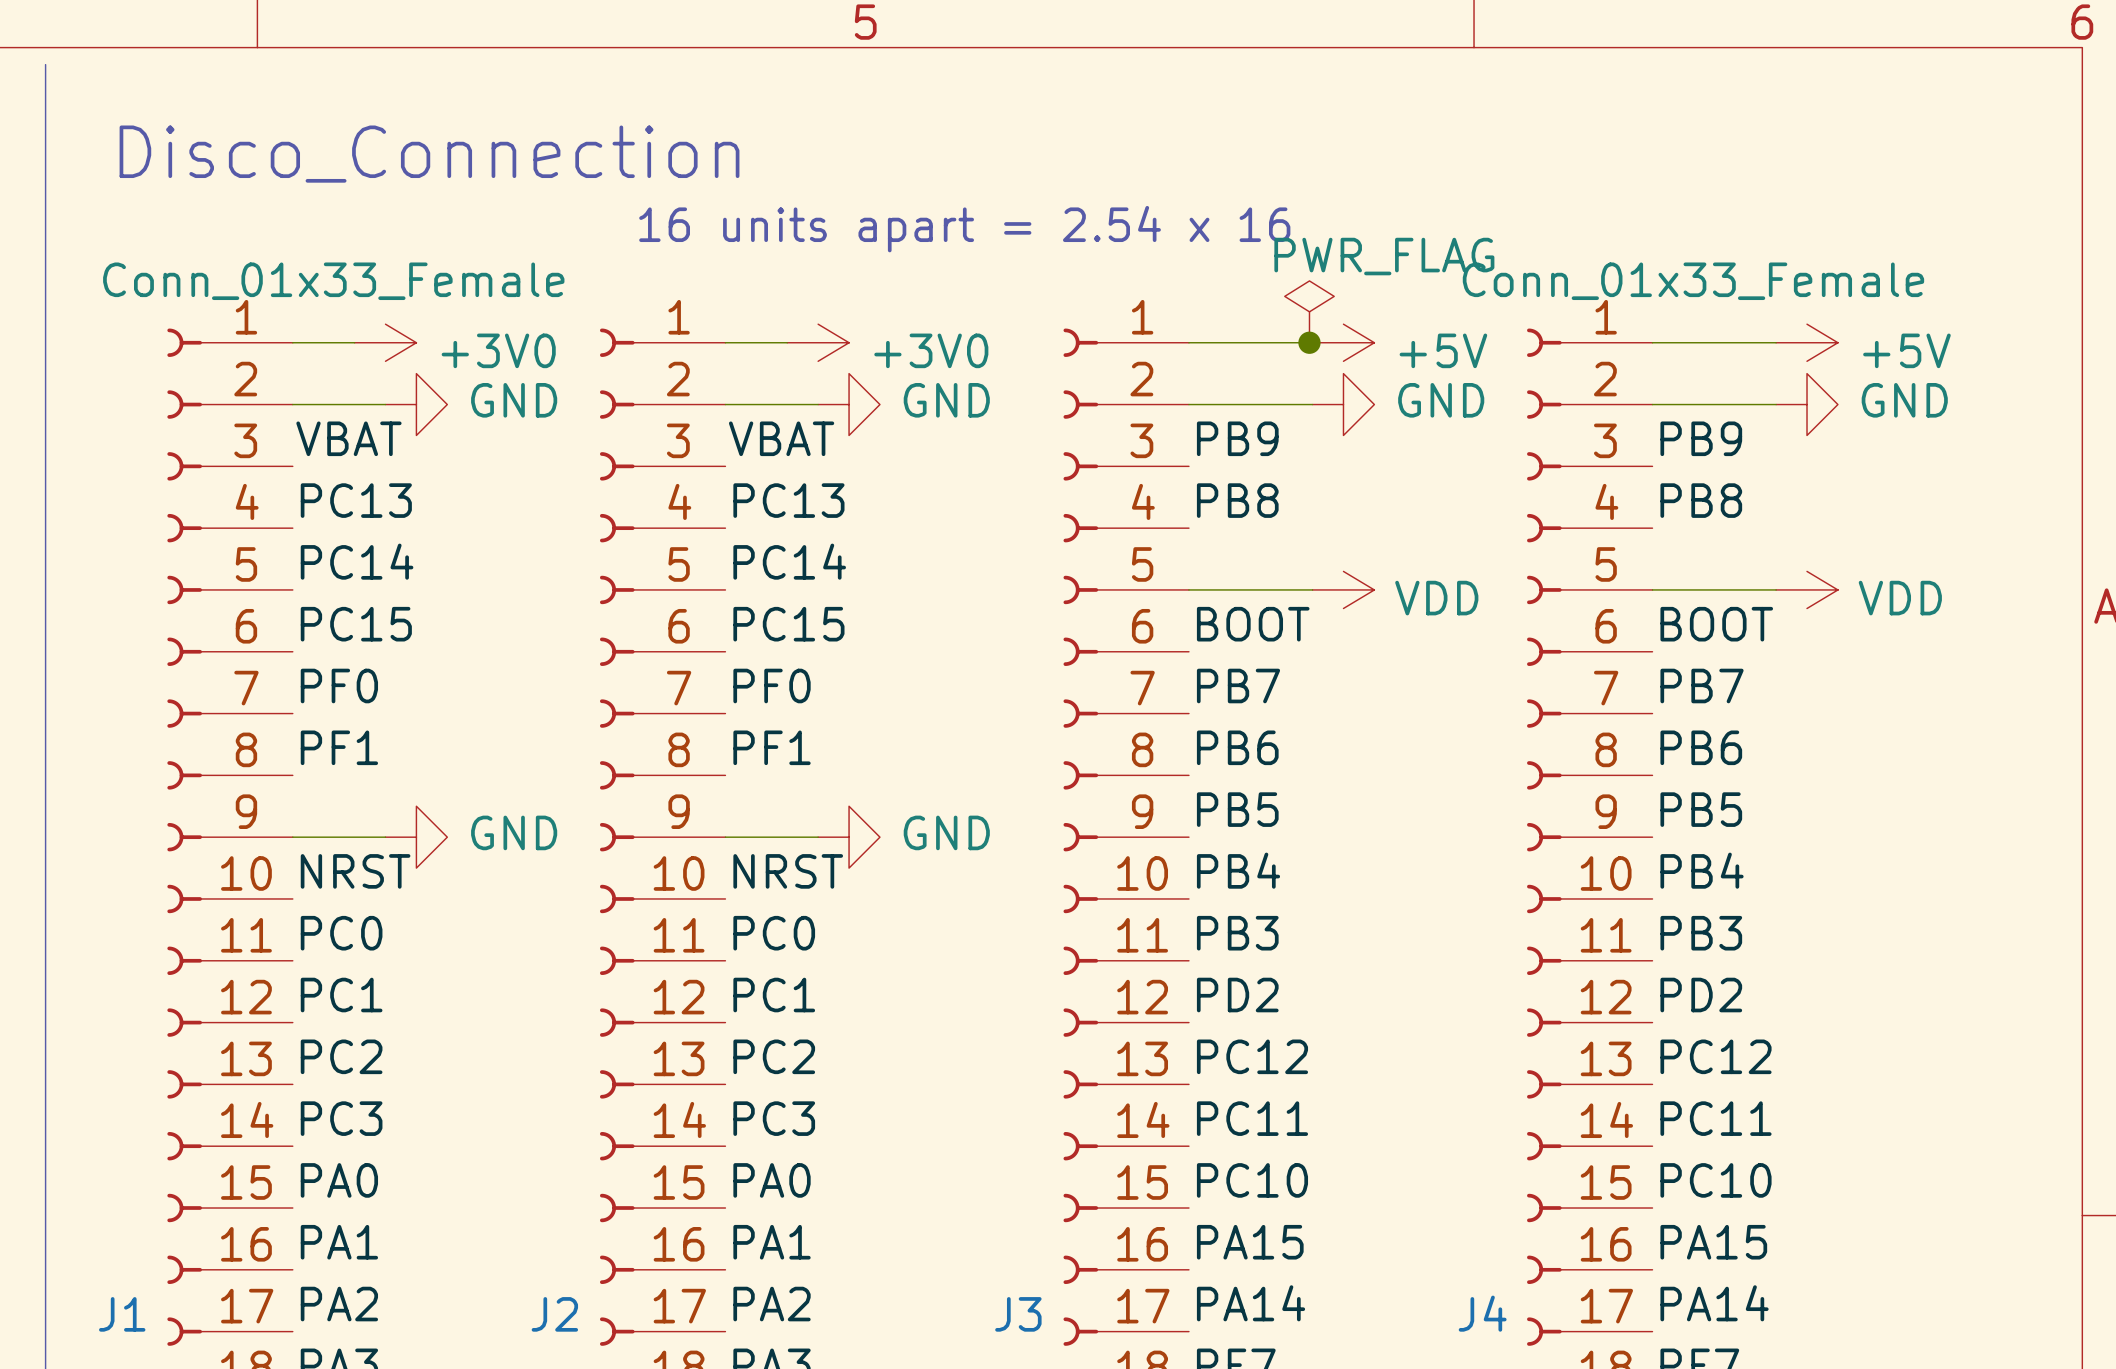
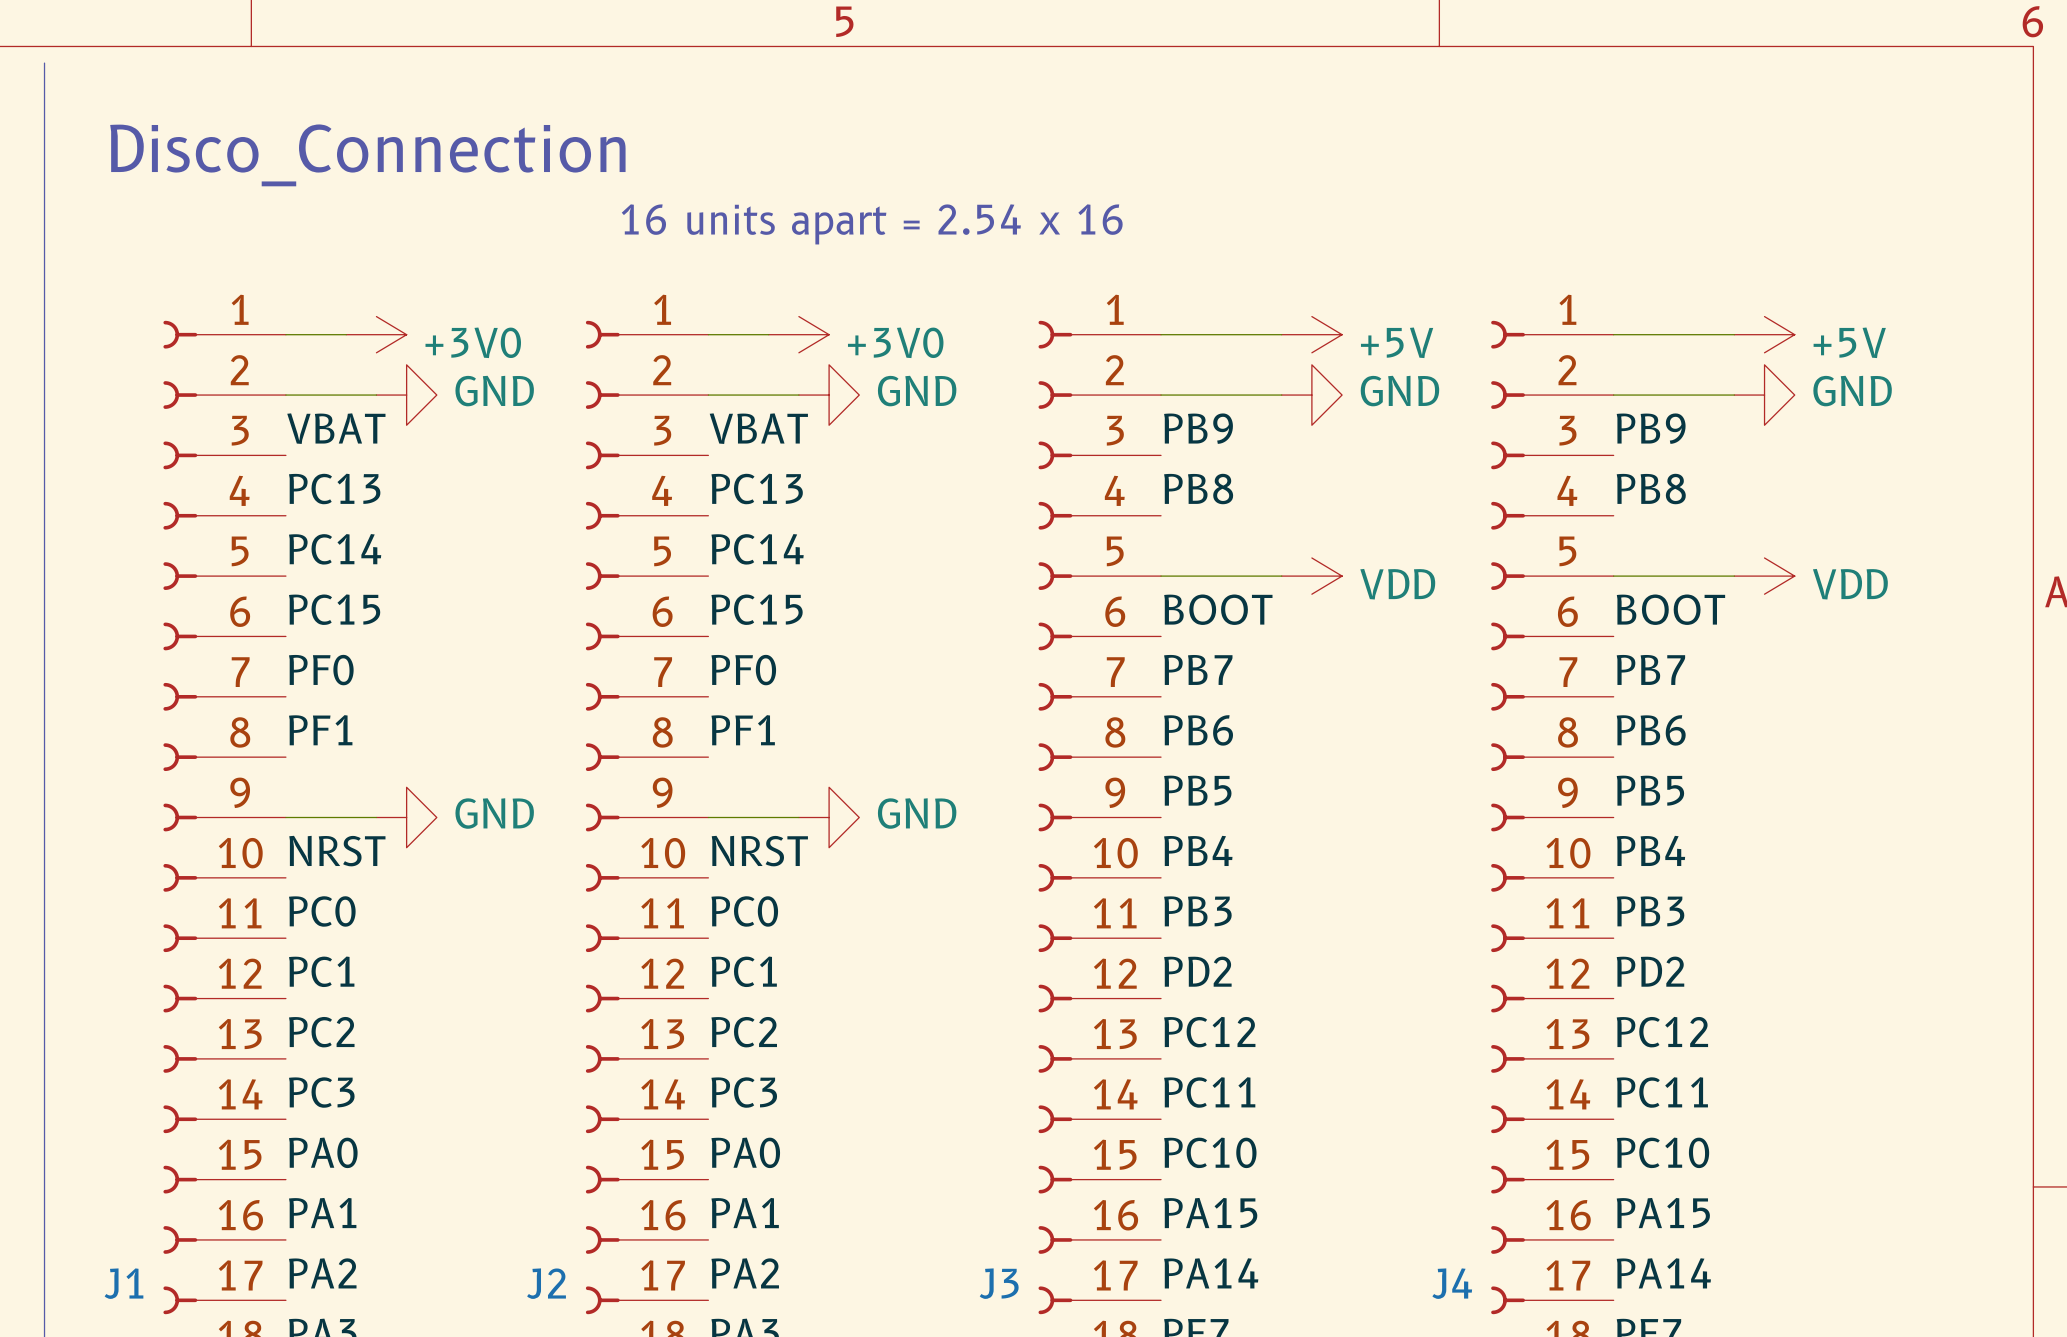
J1 value: Conn_01x33_Female (333, 281) -> none
J4 value: Conn_01x33_Female (1693, 281) -> none
power symbol: PWR_FLAG (1309, 311) -> none
junction: (1309, 342) -> none

